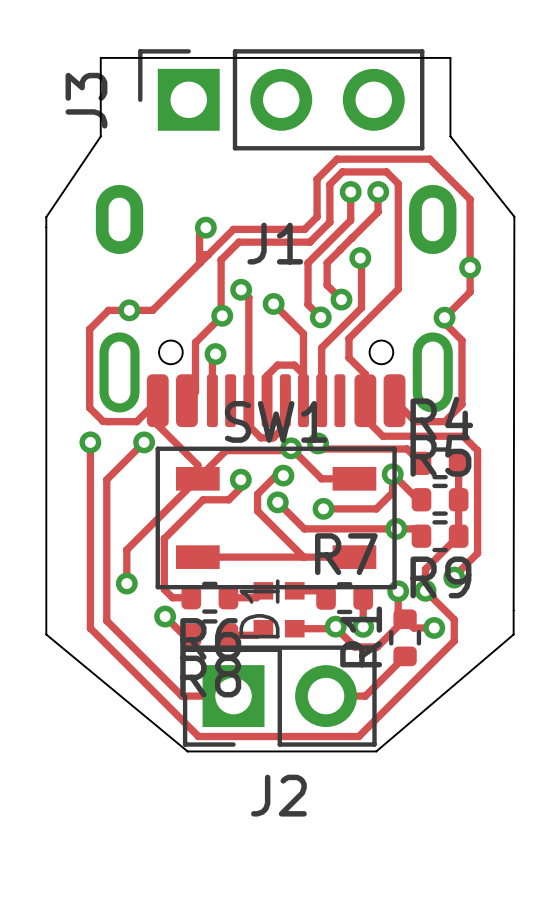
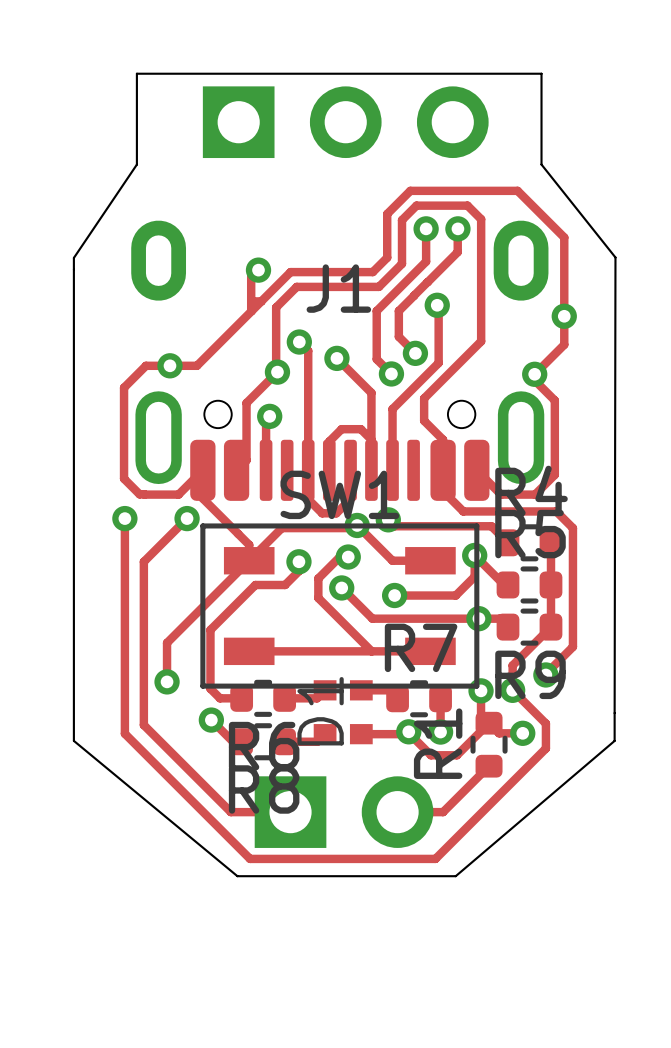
J3: (281, 99) -> none
J2: (279, 696) -> none

